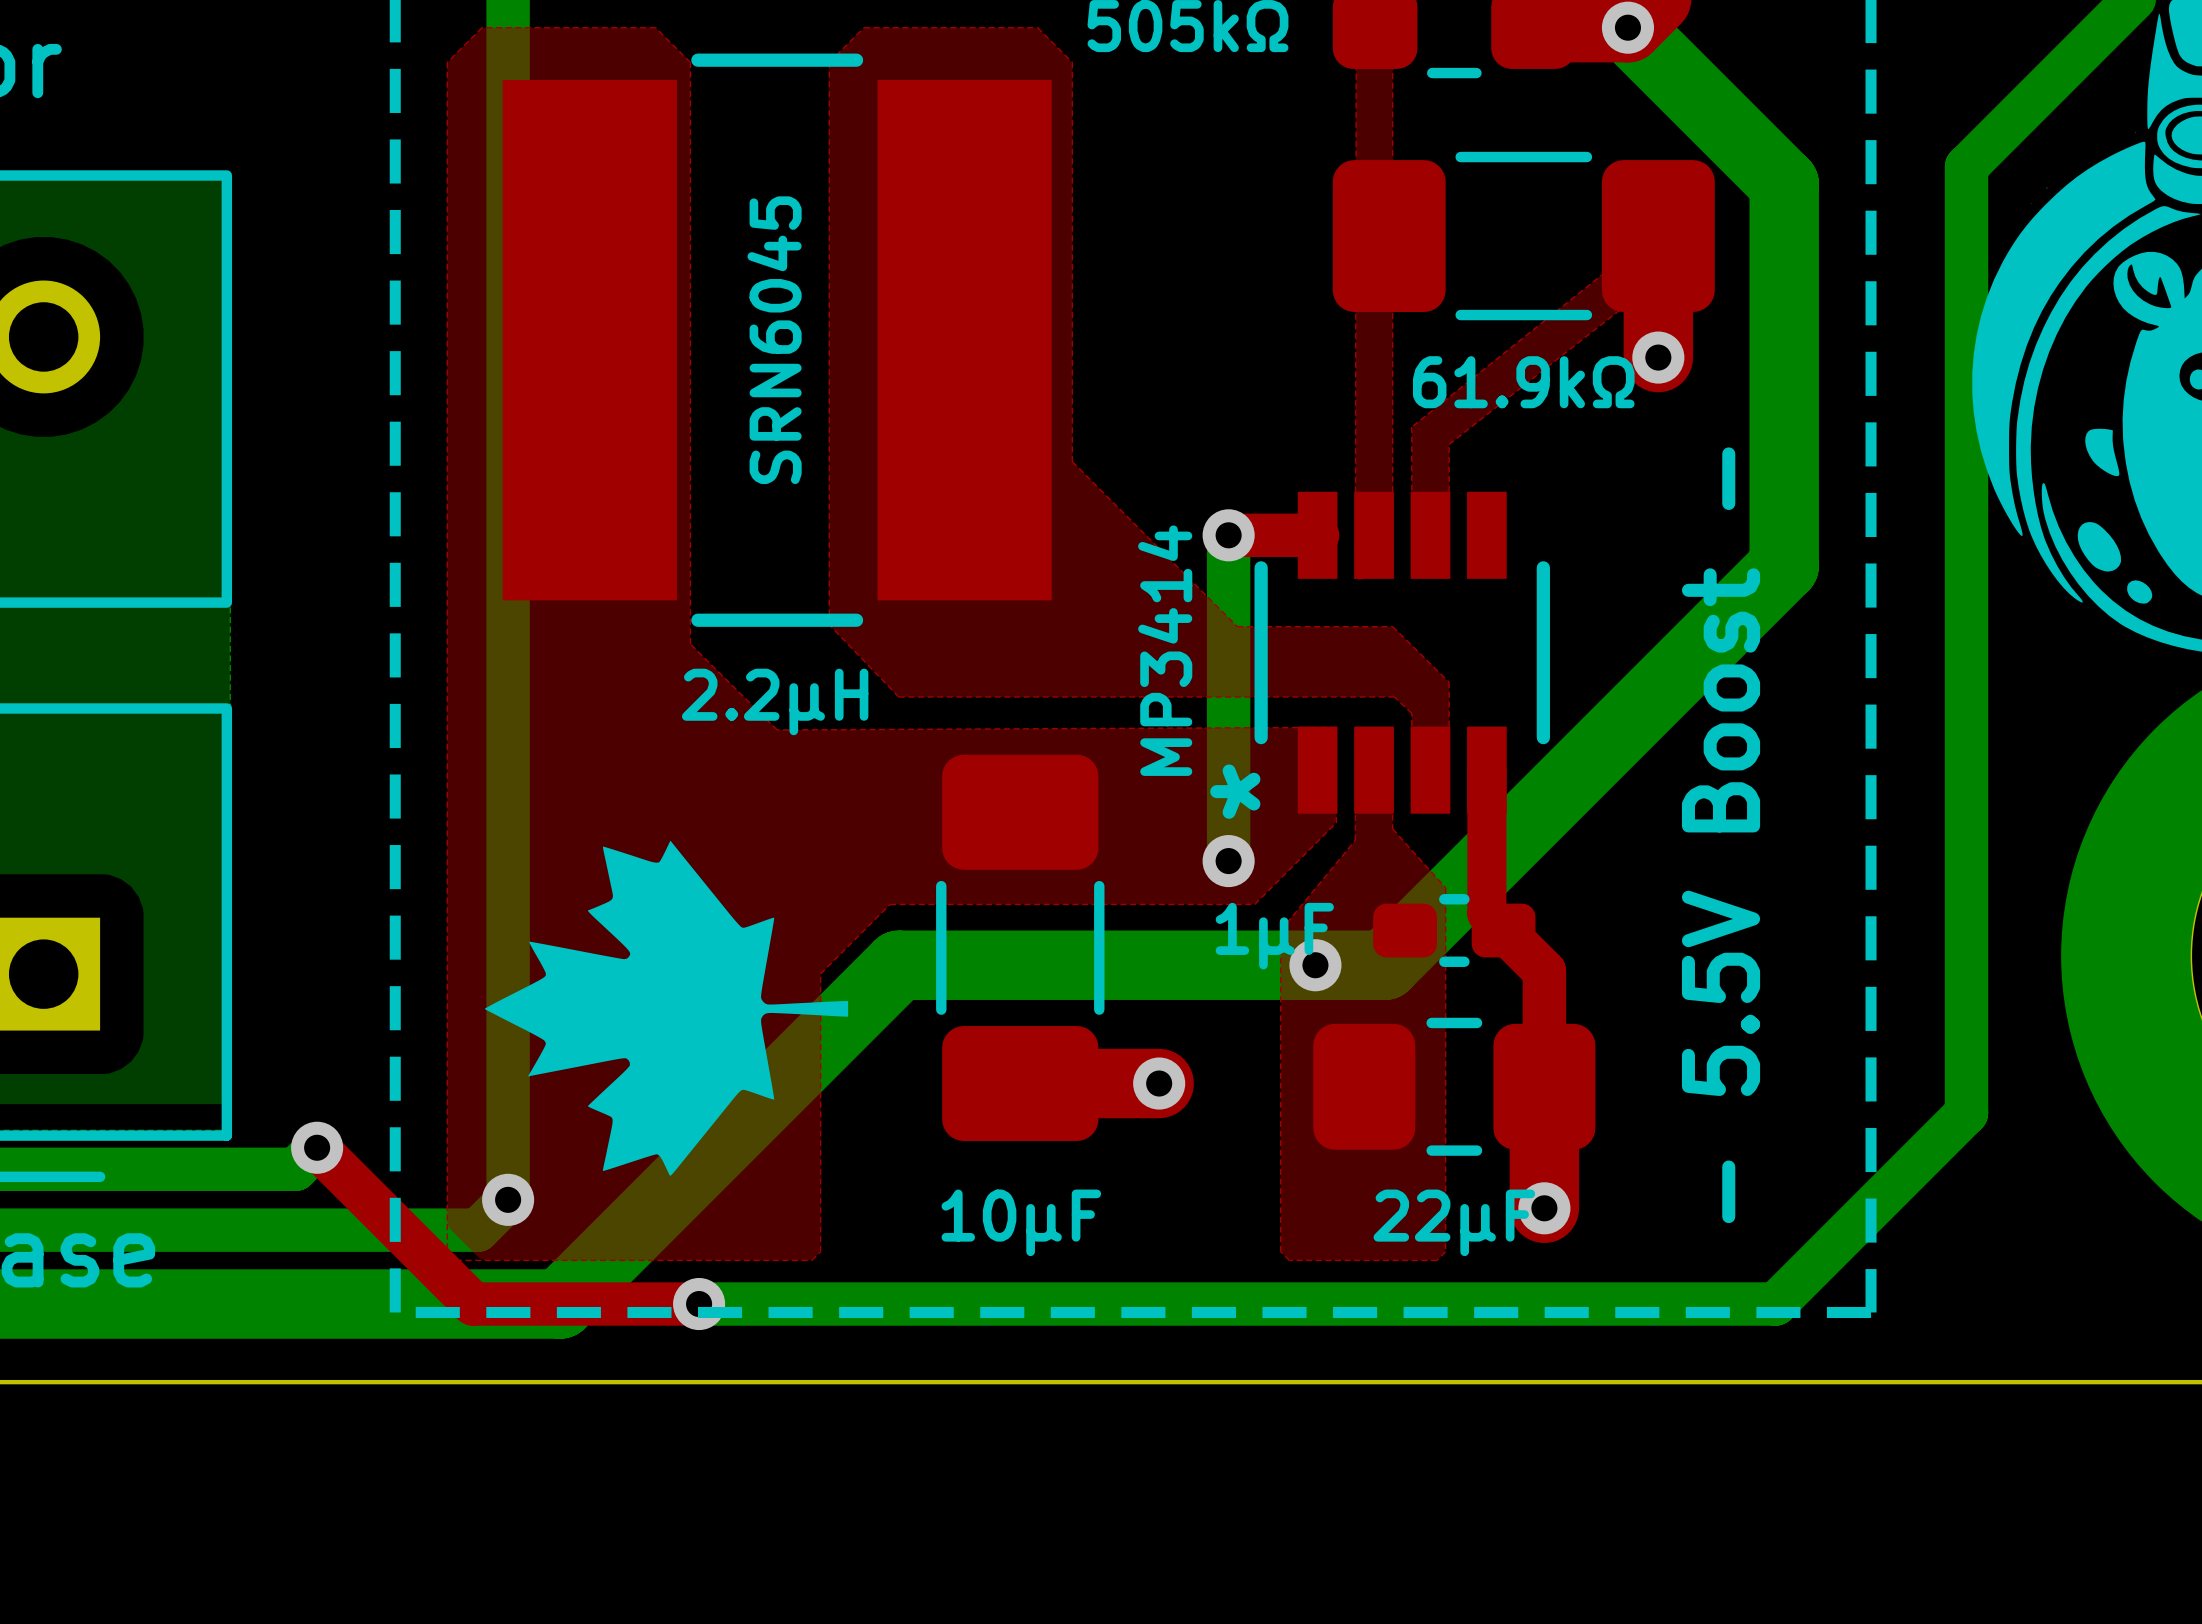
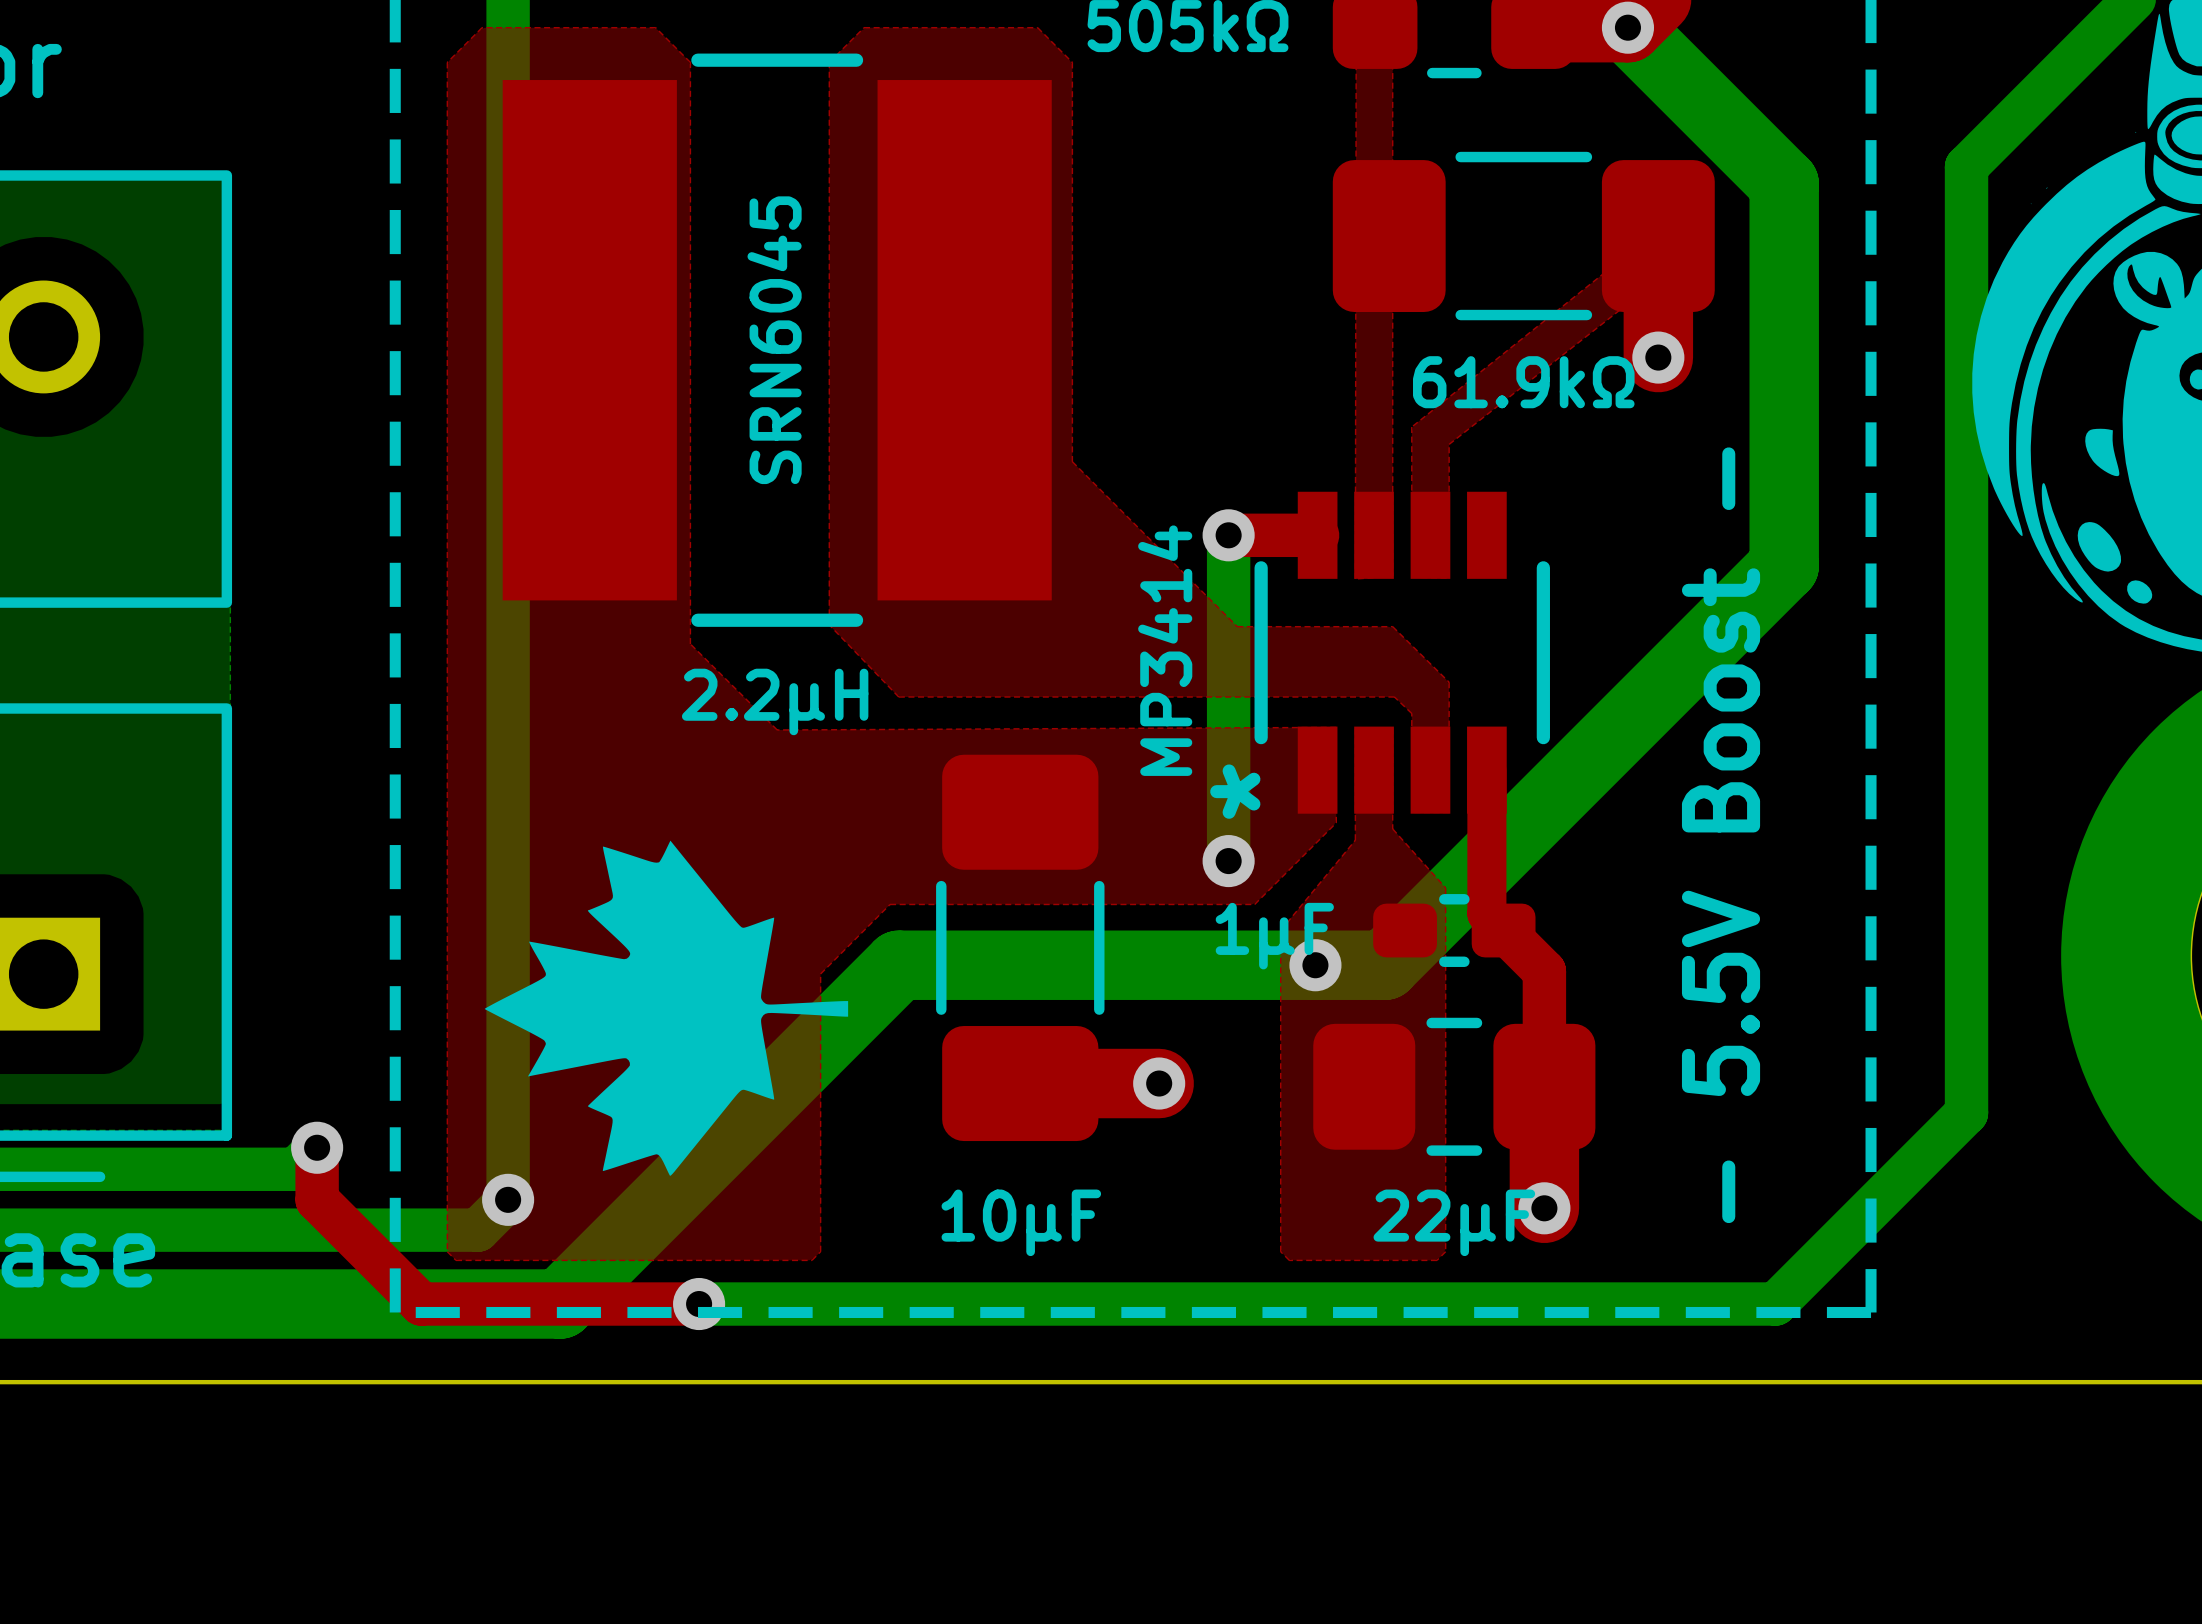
top track: (317, 1147) (473, 1304) -> (317, 1147) (317, 1199) (421, 1304) (473, 1304)

